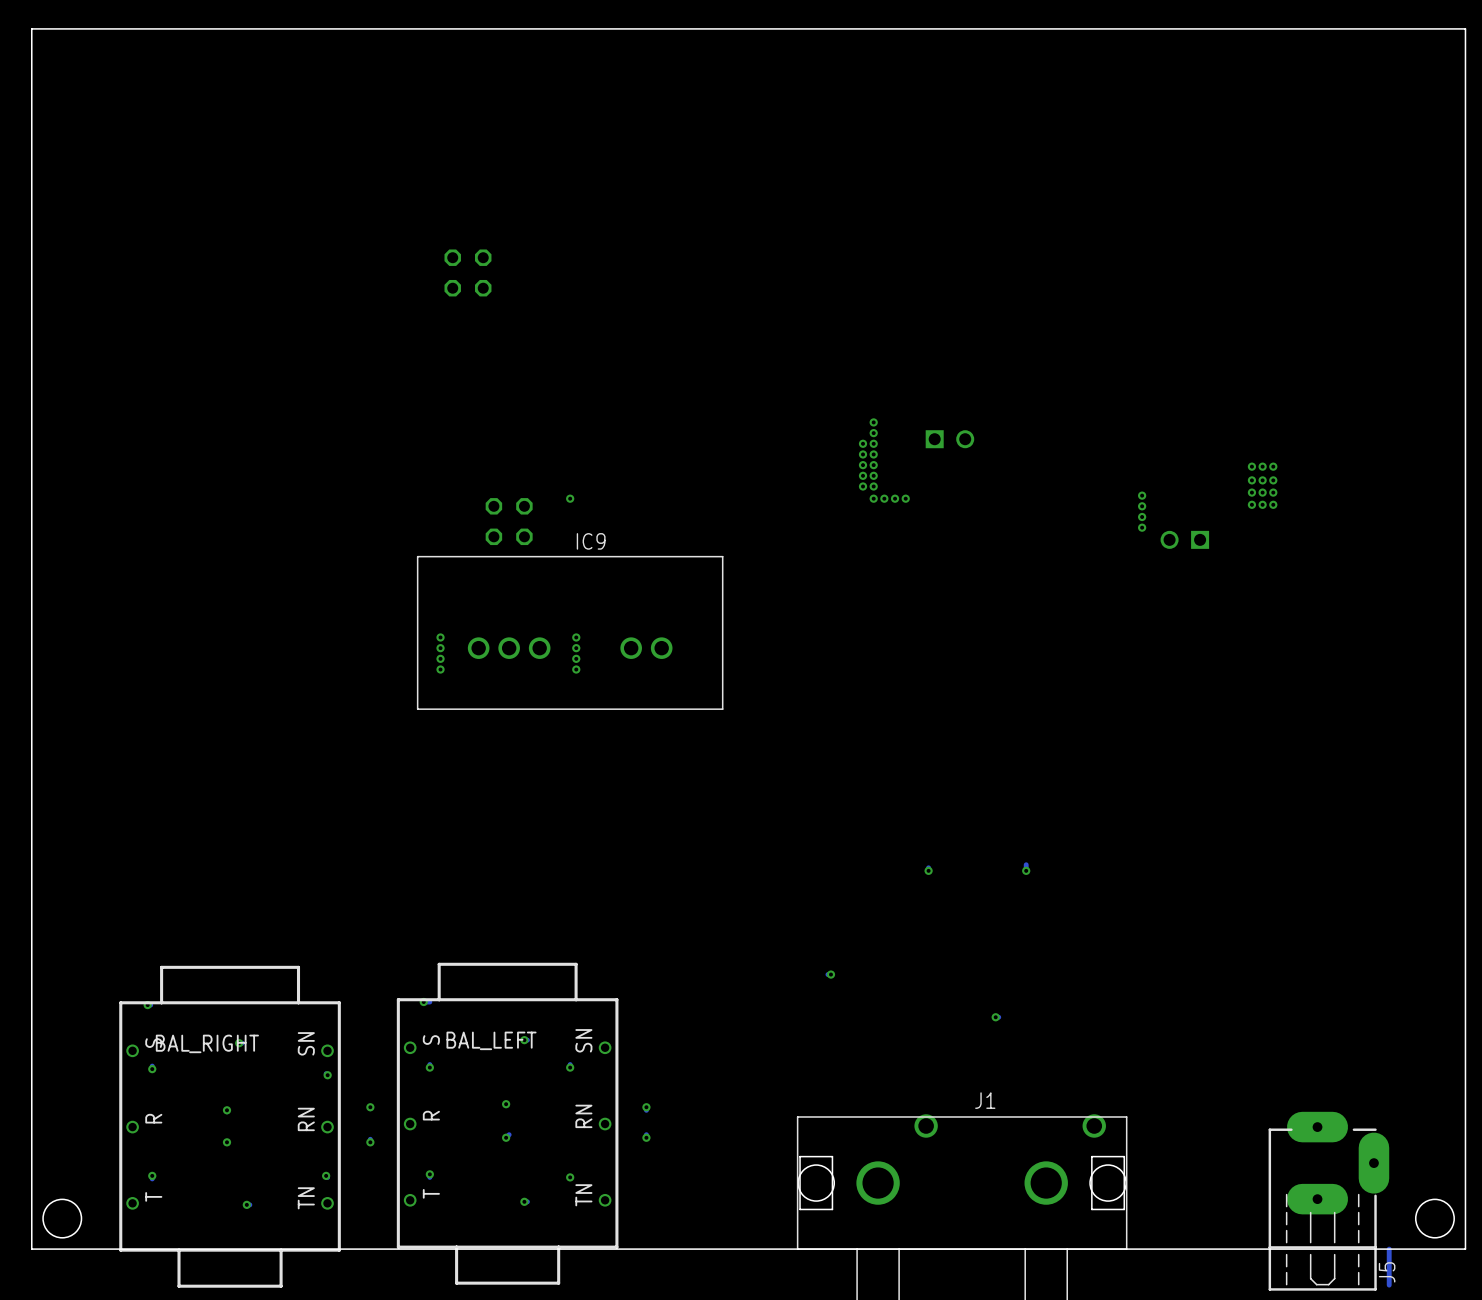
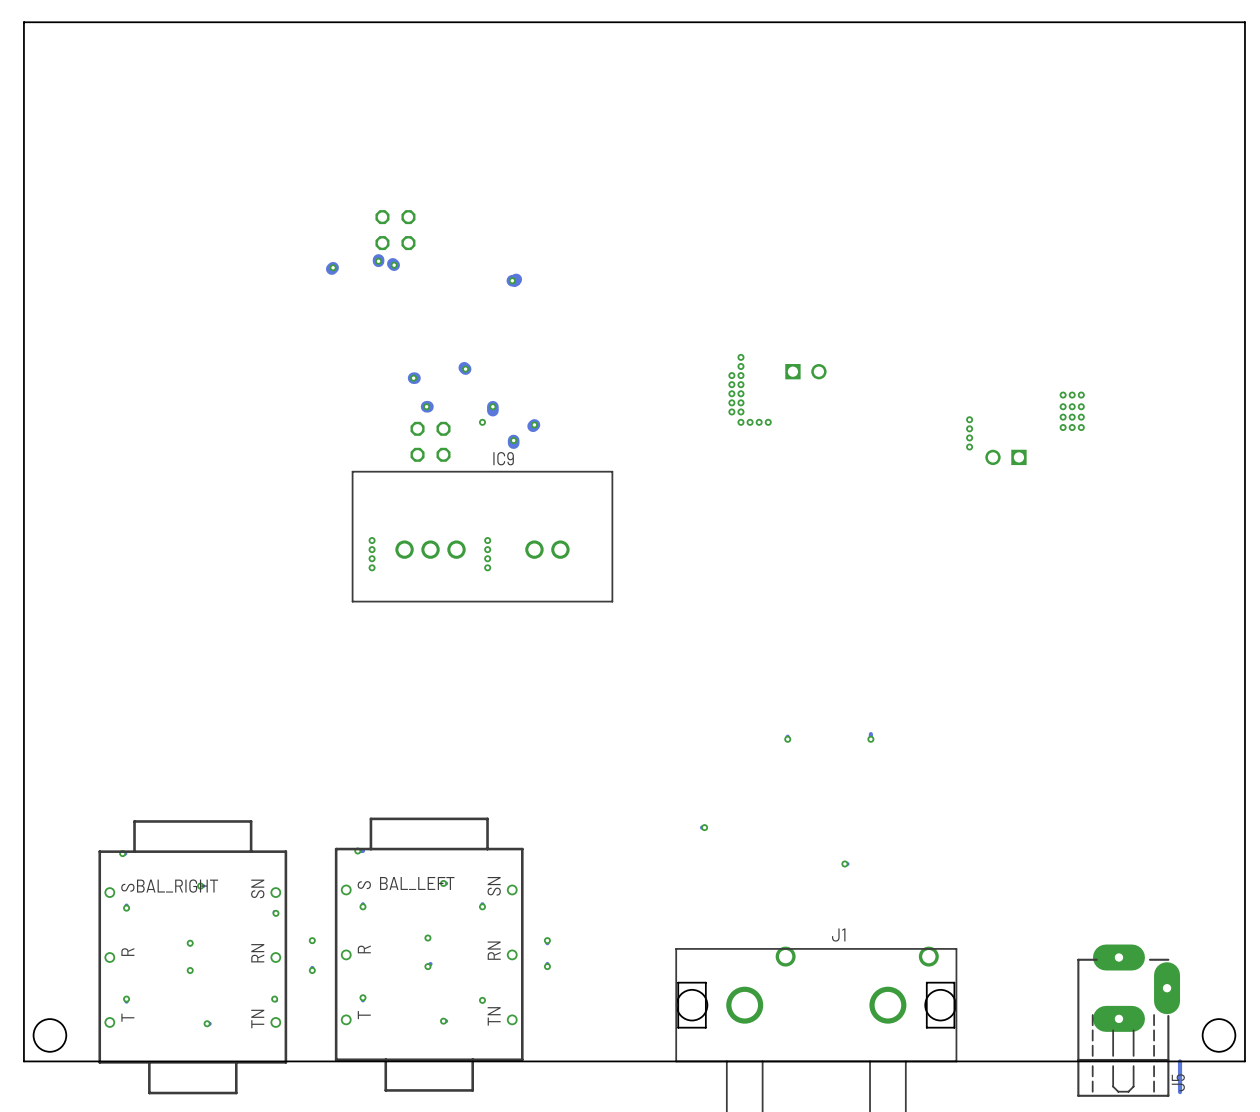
track: none -> (378, 259) (378, 261)
via: none -> (378, 261)
track: none -> (392, 263) (394, 265)
via: none -> (394, 265)
track: none -> (333, 267) (331, 269)
via: none -> (333, 267)
track: none -> (516, 279) (512, 280)
via: none -> (512, 280)
track: none -> (464, 367) (465, 369)
via: none -> (465, 369)
via: none -> (413, 378)
track: none -> (414, 378) (413, 378)
via: none -> (426, 406)
track: none -> (427, 406) (426, 406)
track: none -> (492, 406) (492, 410)
via: none -> (492, 406)
track: none -> (534, 424) (533, 426)
via: none -> (534, 424)
track: none -> (513, 440) (513, 443)
via: none -> (513, 440)

